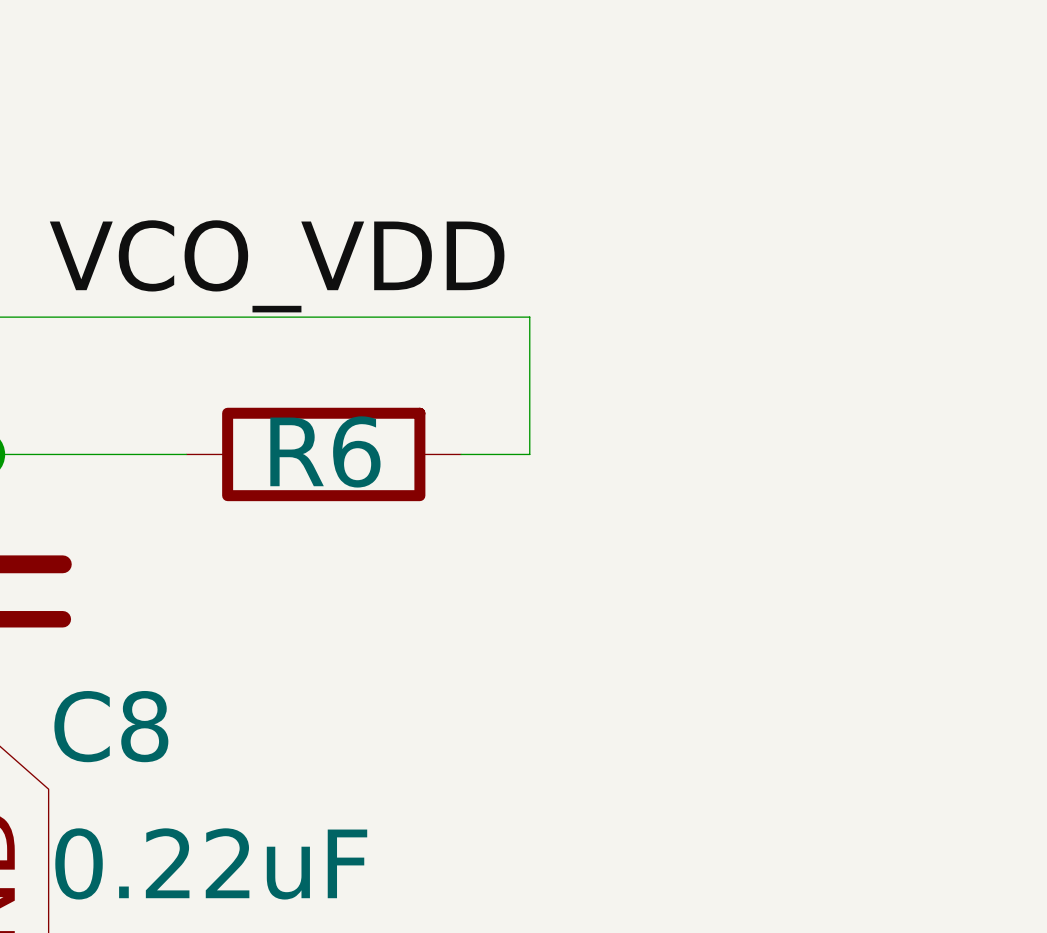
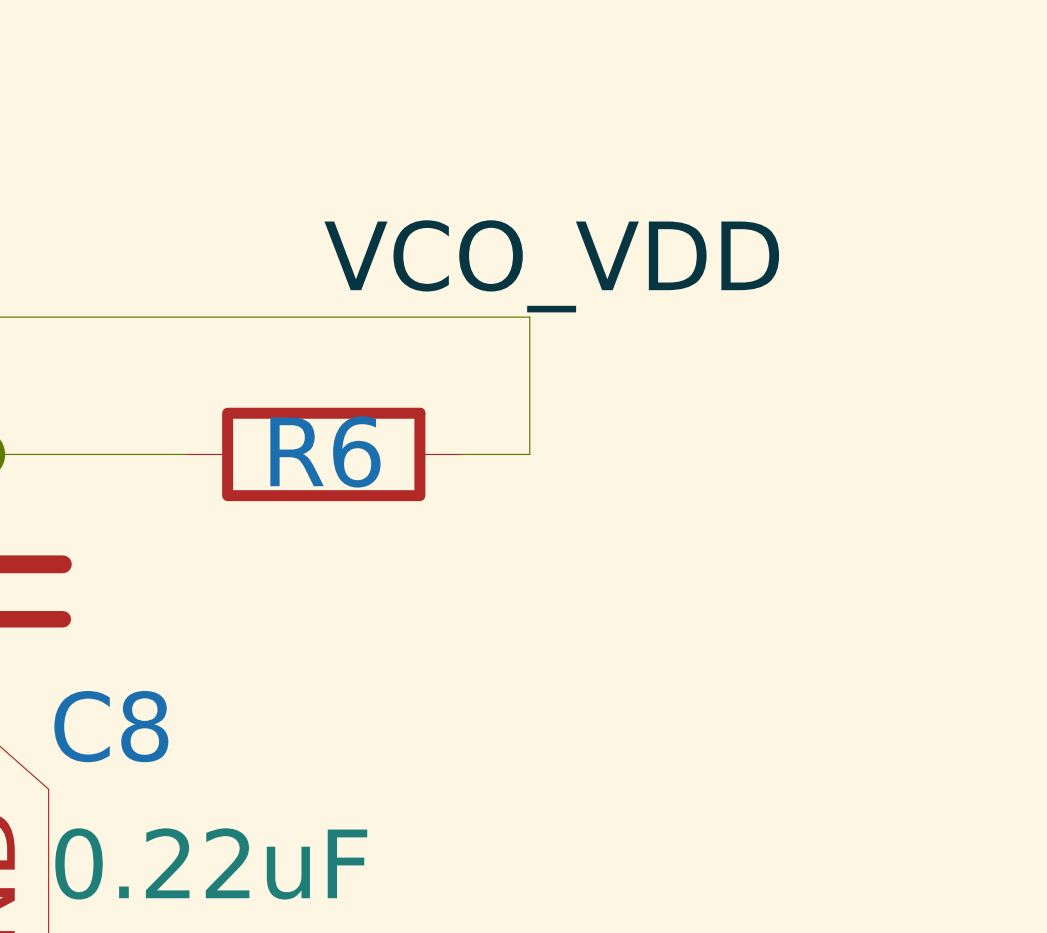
label position: VCO_VDD (277, 266) -> VCO_VDD (551, 266)

